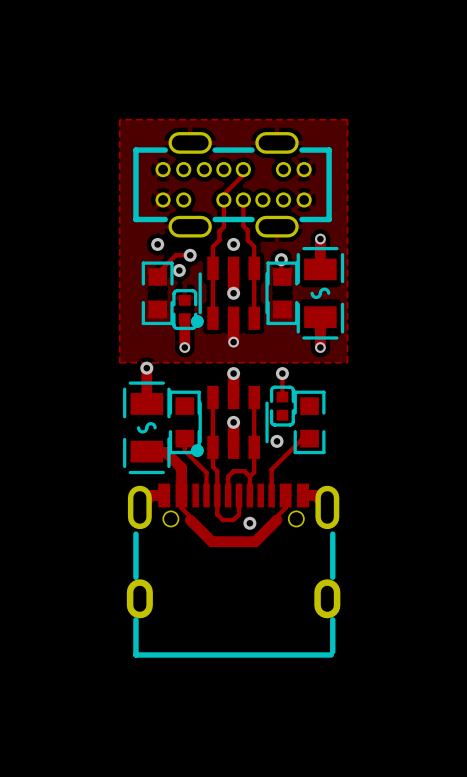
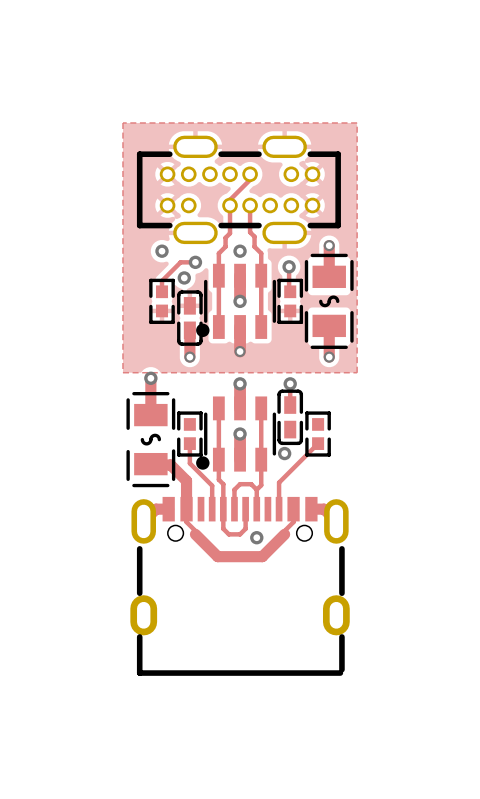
part footprint: [141, 261, 174, 326] -> [149, 278, 175, 324]
part footprint: [266, 261, 299, 326] -> [277, 278, 304, 324]
part footprint: [172, 289, 198, 331] -> [177, 290, 203, 346]
part footprint: [269, 385, 295, 427] -> [277, 389, 304, 446]
part footprint: [168, 390, 201, 455] -> [177, 411, 203, 457]
part footprint: [293, 390, 326, 455] -> [305, 411, 331, 457]

